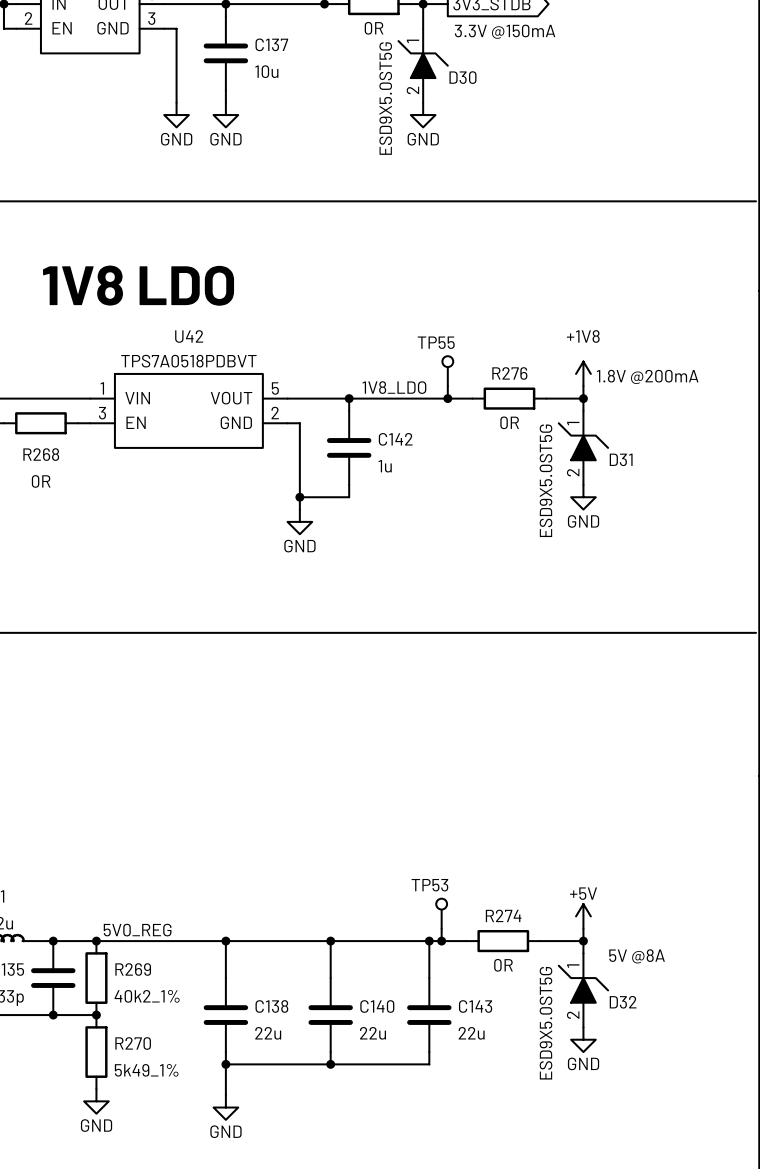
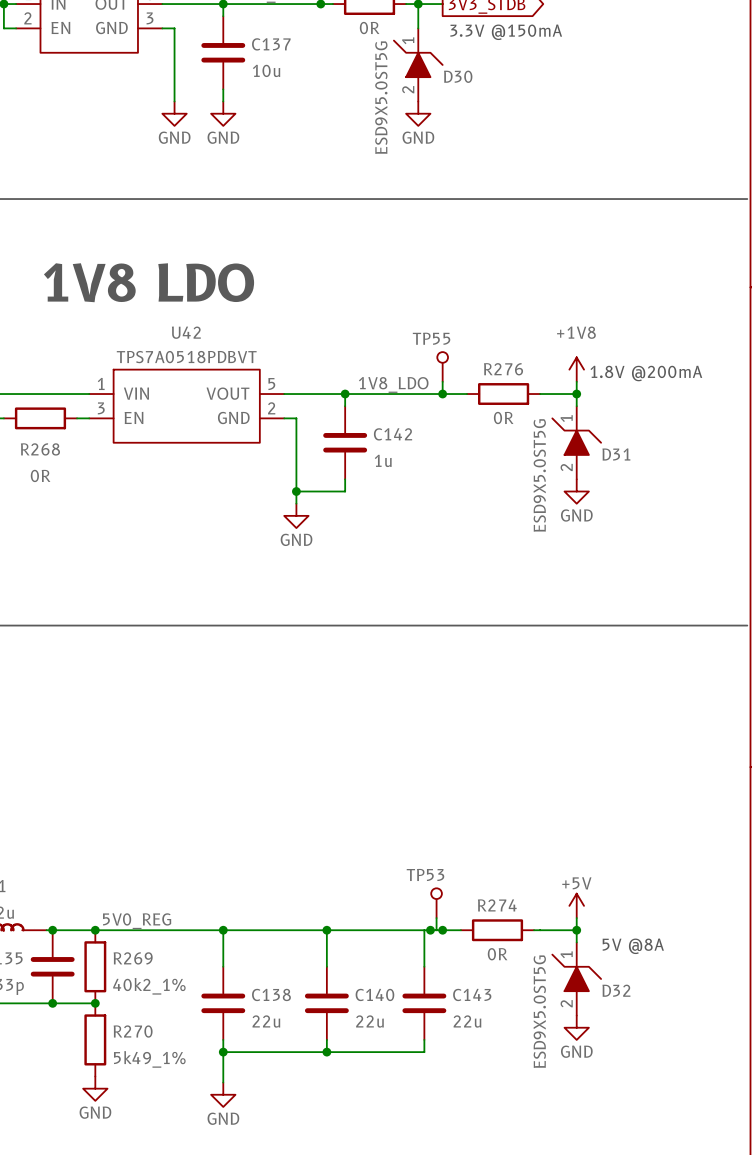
junction: (429, 941) -> none
junction: none -> (430, 930)
junction: (441, 941) -> none
junction: none -> (442, 930)

